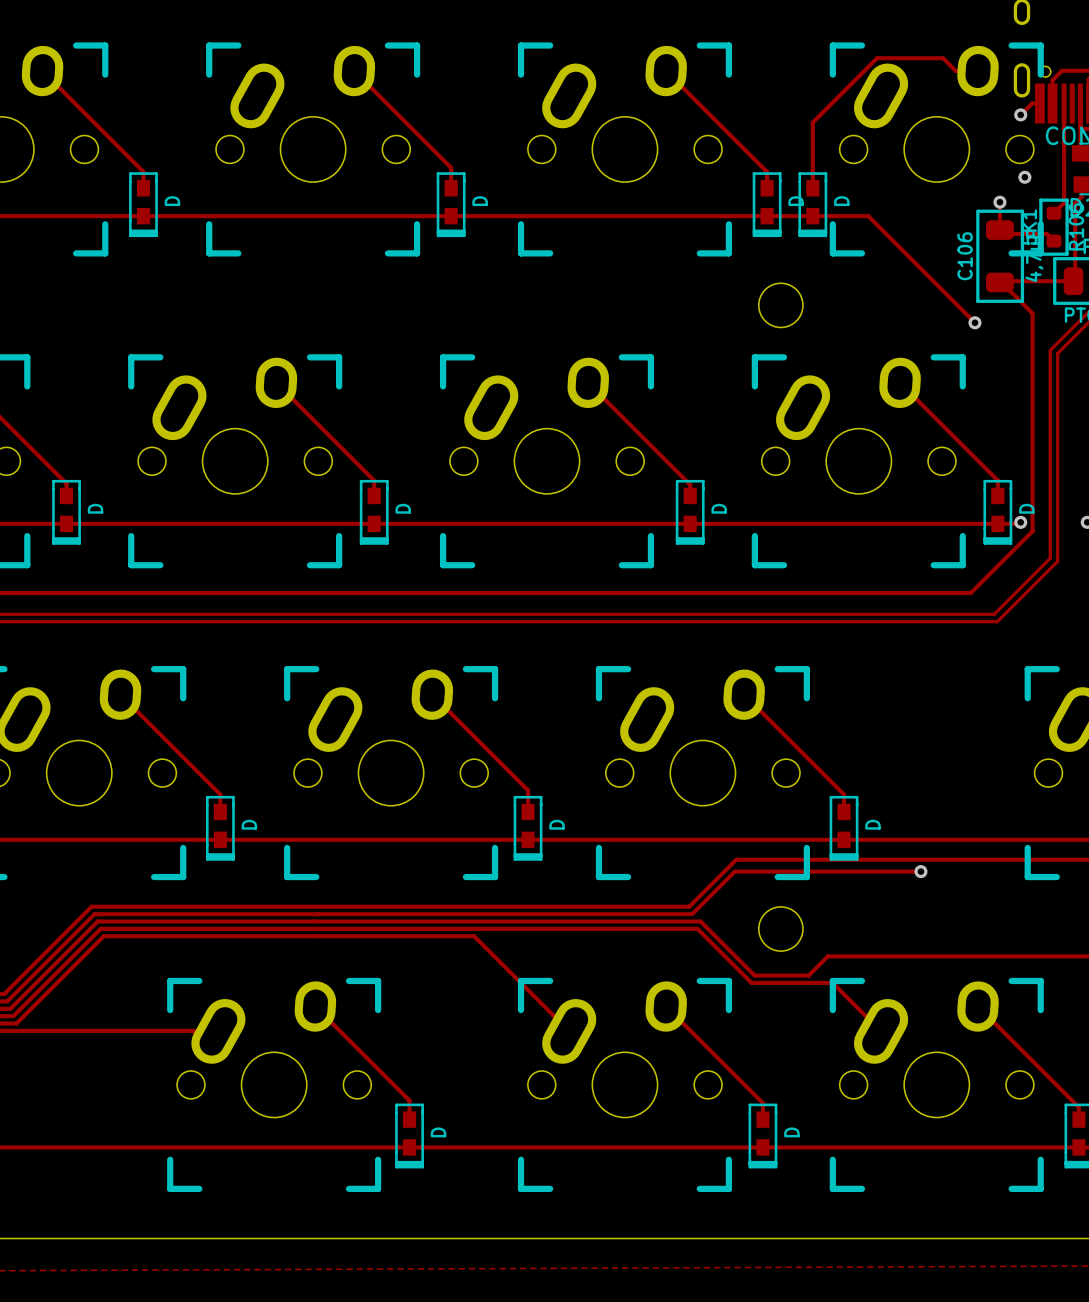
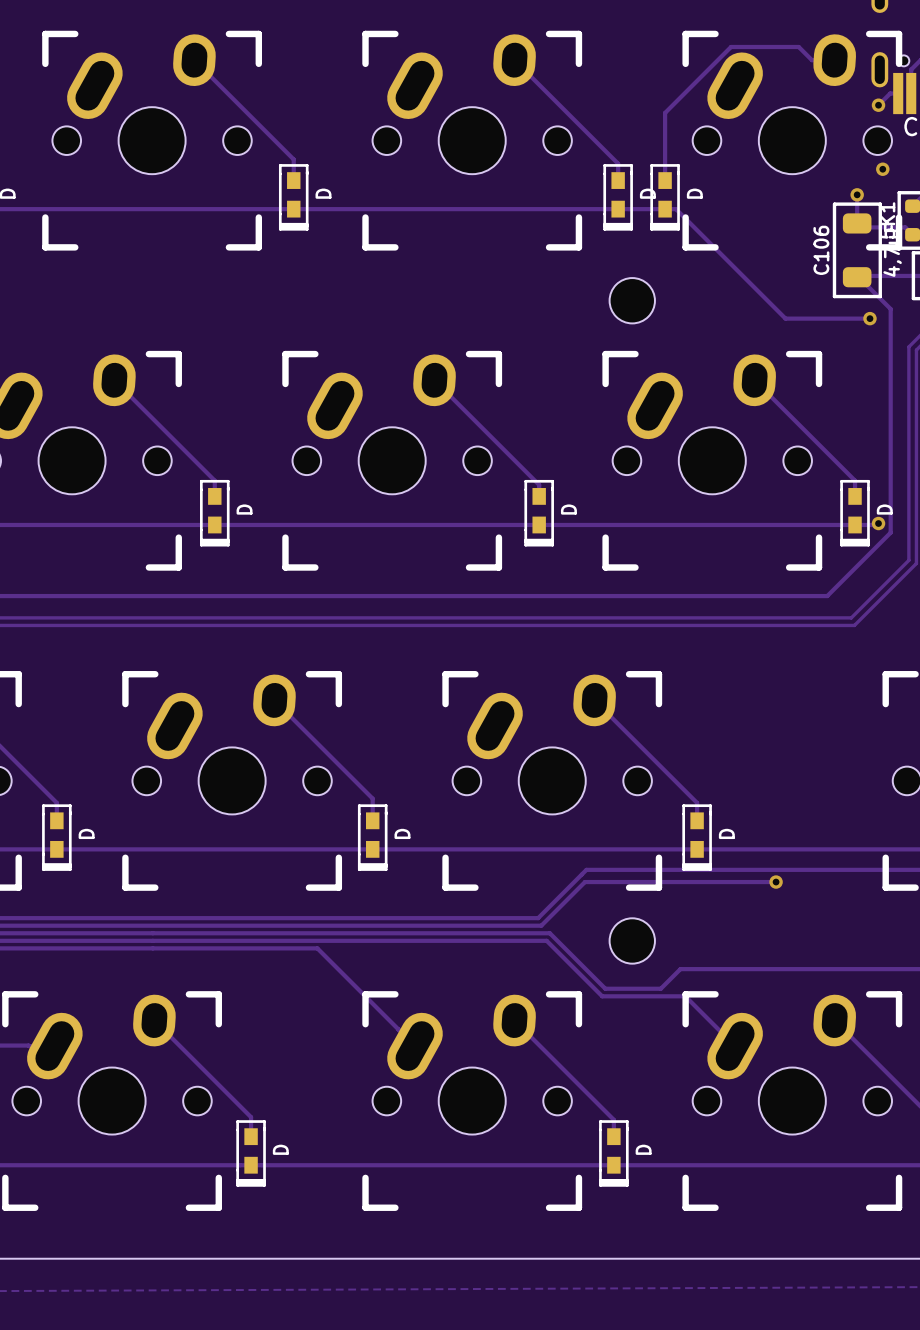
track: (823, 216) (868, 216) (974, 322) -> (676, 209) (785, 318) (869, 318)
via position: (974, 322) -> (869, 318)

